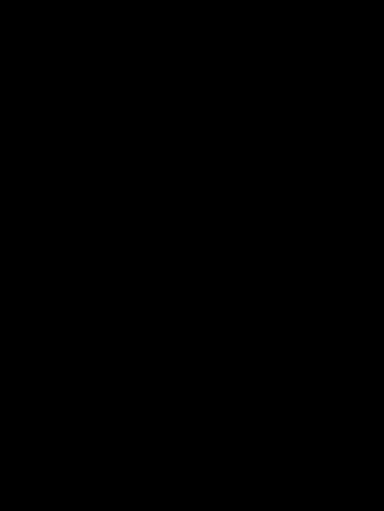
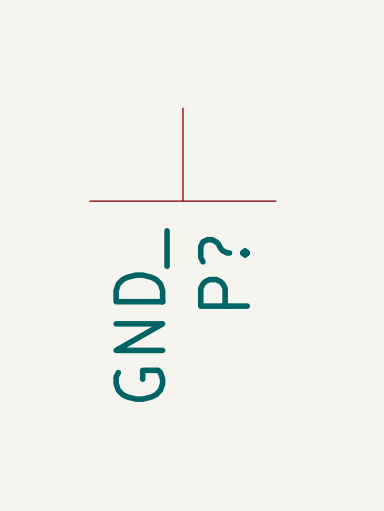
P?: none -> GND_ (182, 154)

